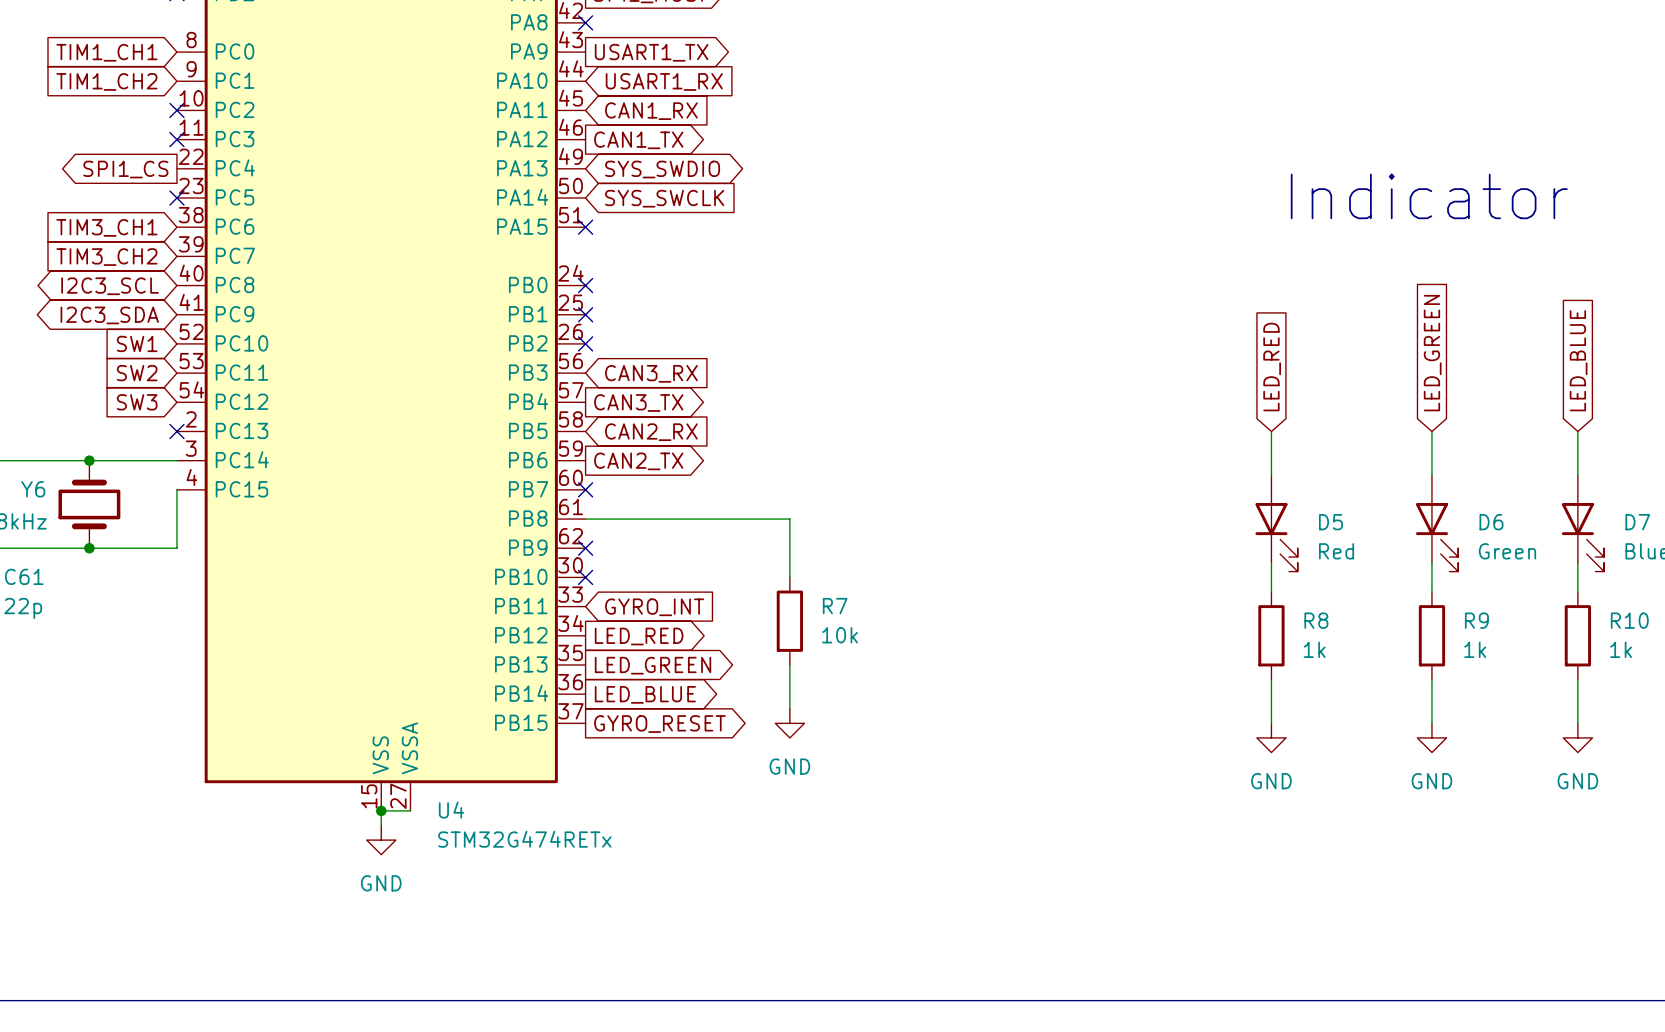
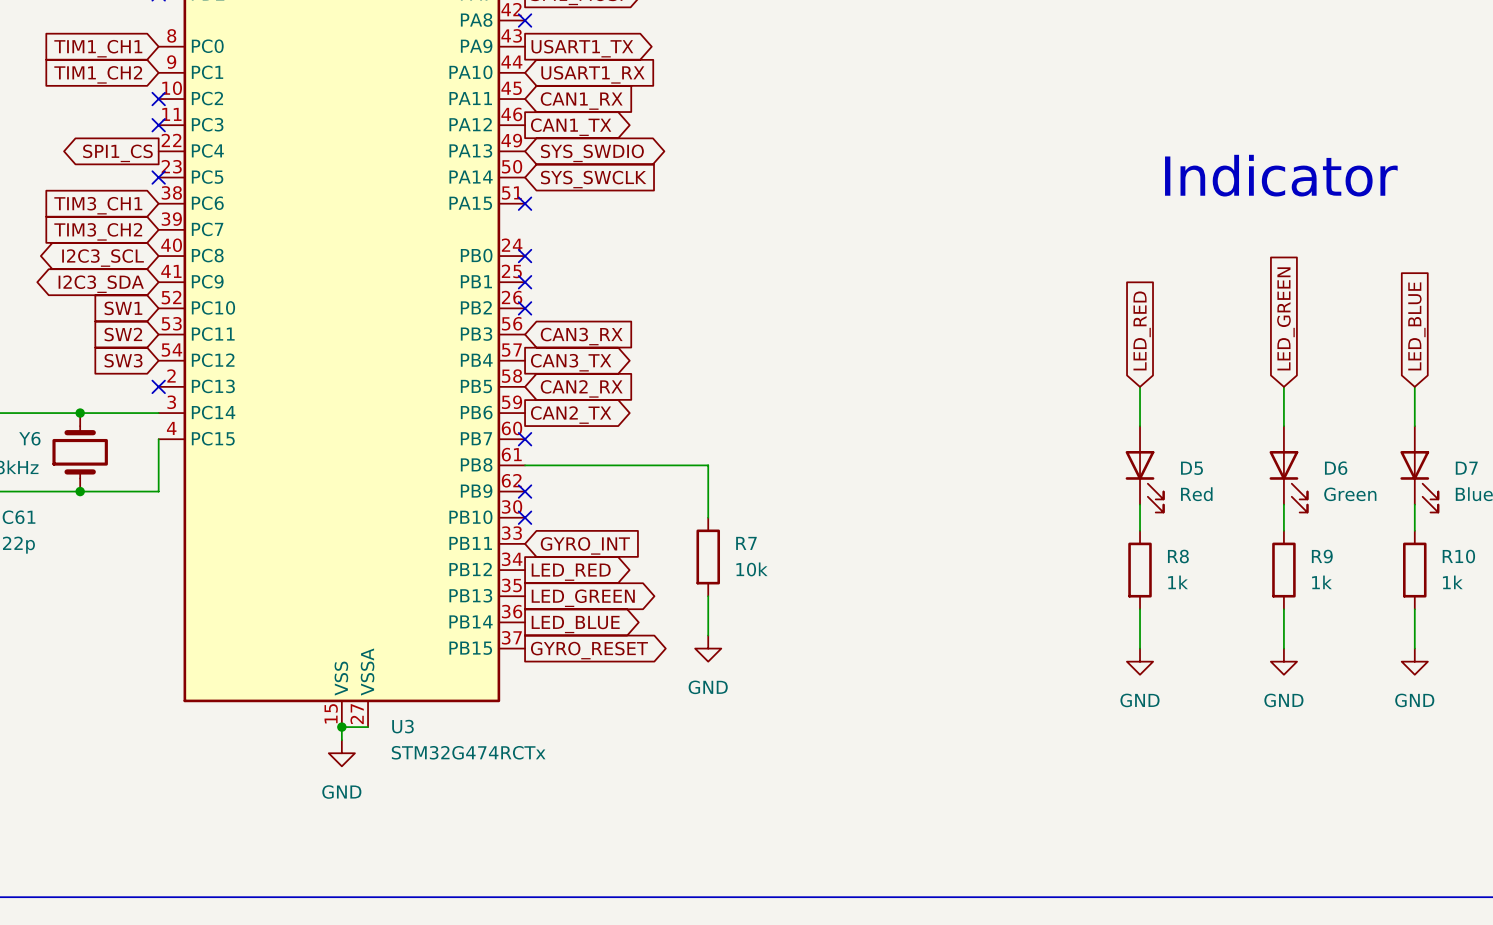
U4 name: U4 (451, 810) -> U3 (402, 726)
U4 value: STM32G474RETx (524, 839) -> STM32G474RCTx (468, 752)

